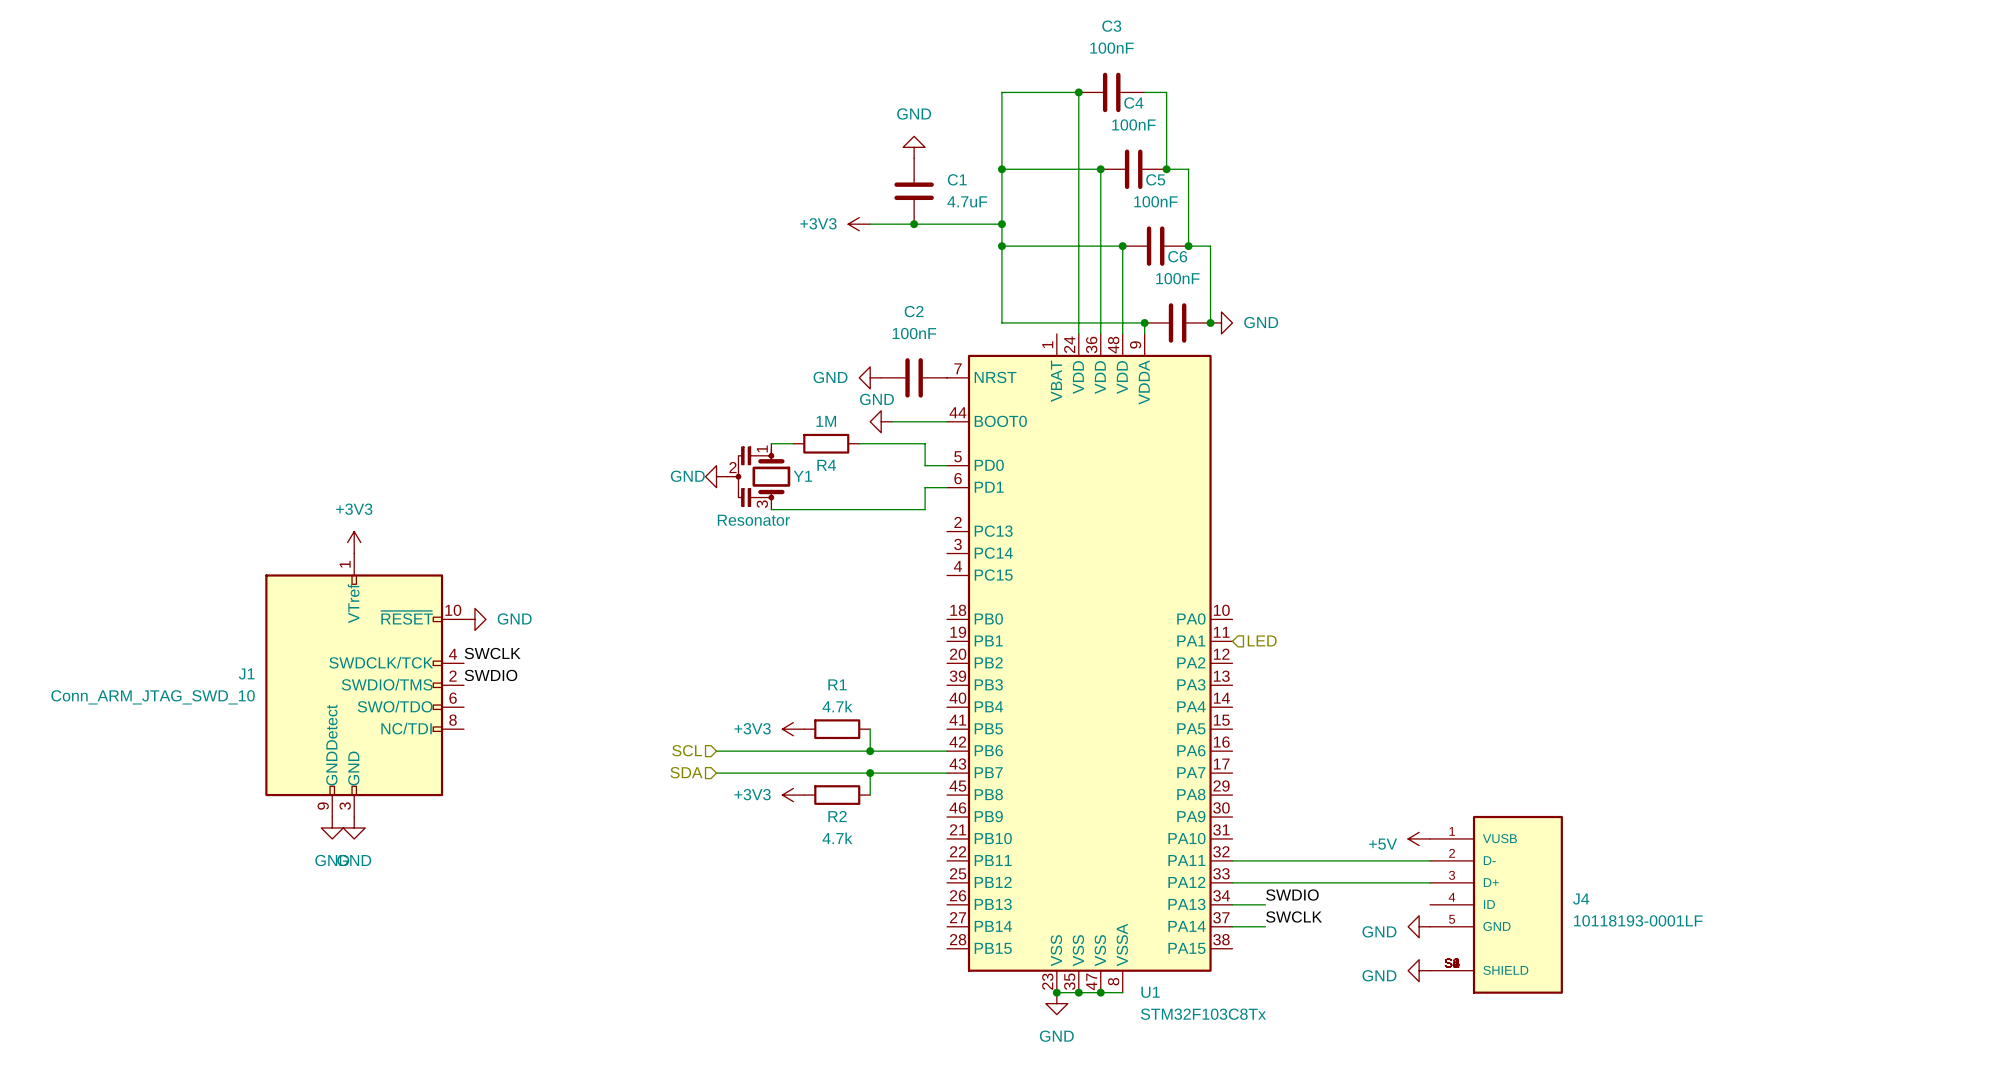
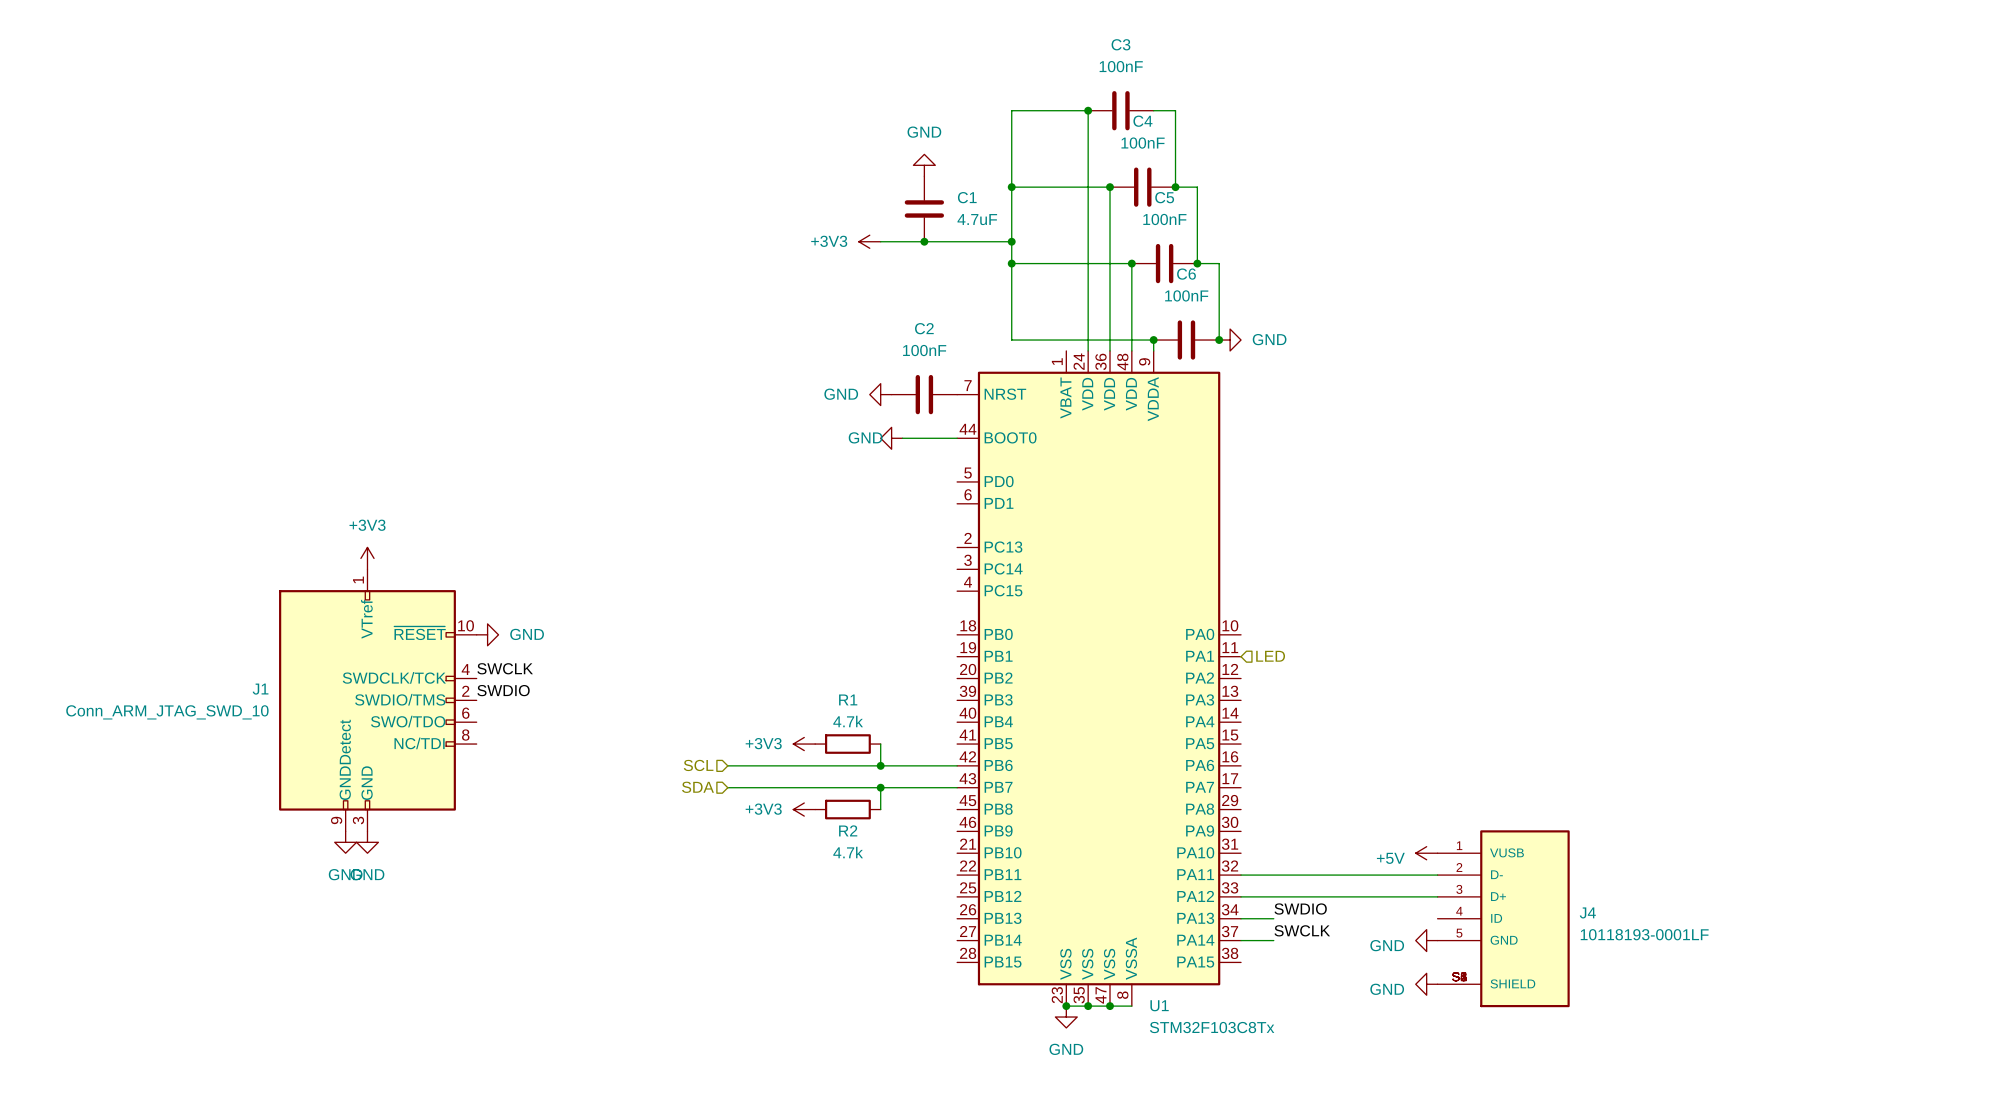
power symbol text position: GND (876, 399) -> GND (865, 437)
wire: (771, 443) (793, 443) -> none
R4: 1M (826, 443) -> none
wire: (859, 443) (925, 443) (925, 465) (947, 465) -> none
power symbol: GND (716, 476) -> none
Y1: Resonator (758, 476) -> none
wire: (947, 487) (925, 487) (925, 509) (771, 509) -> none

